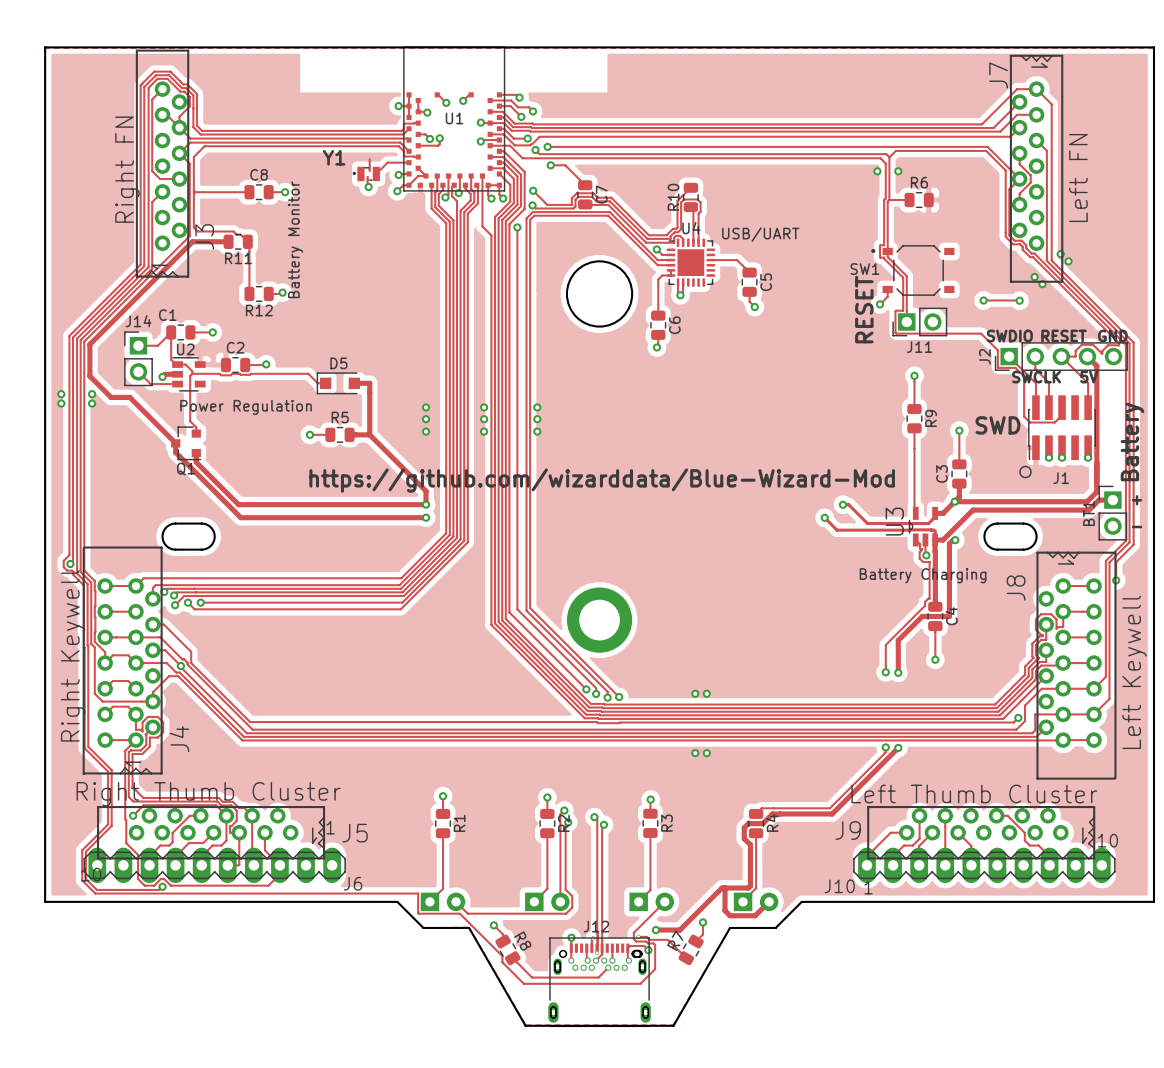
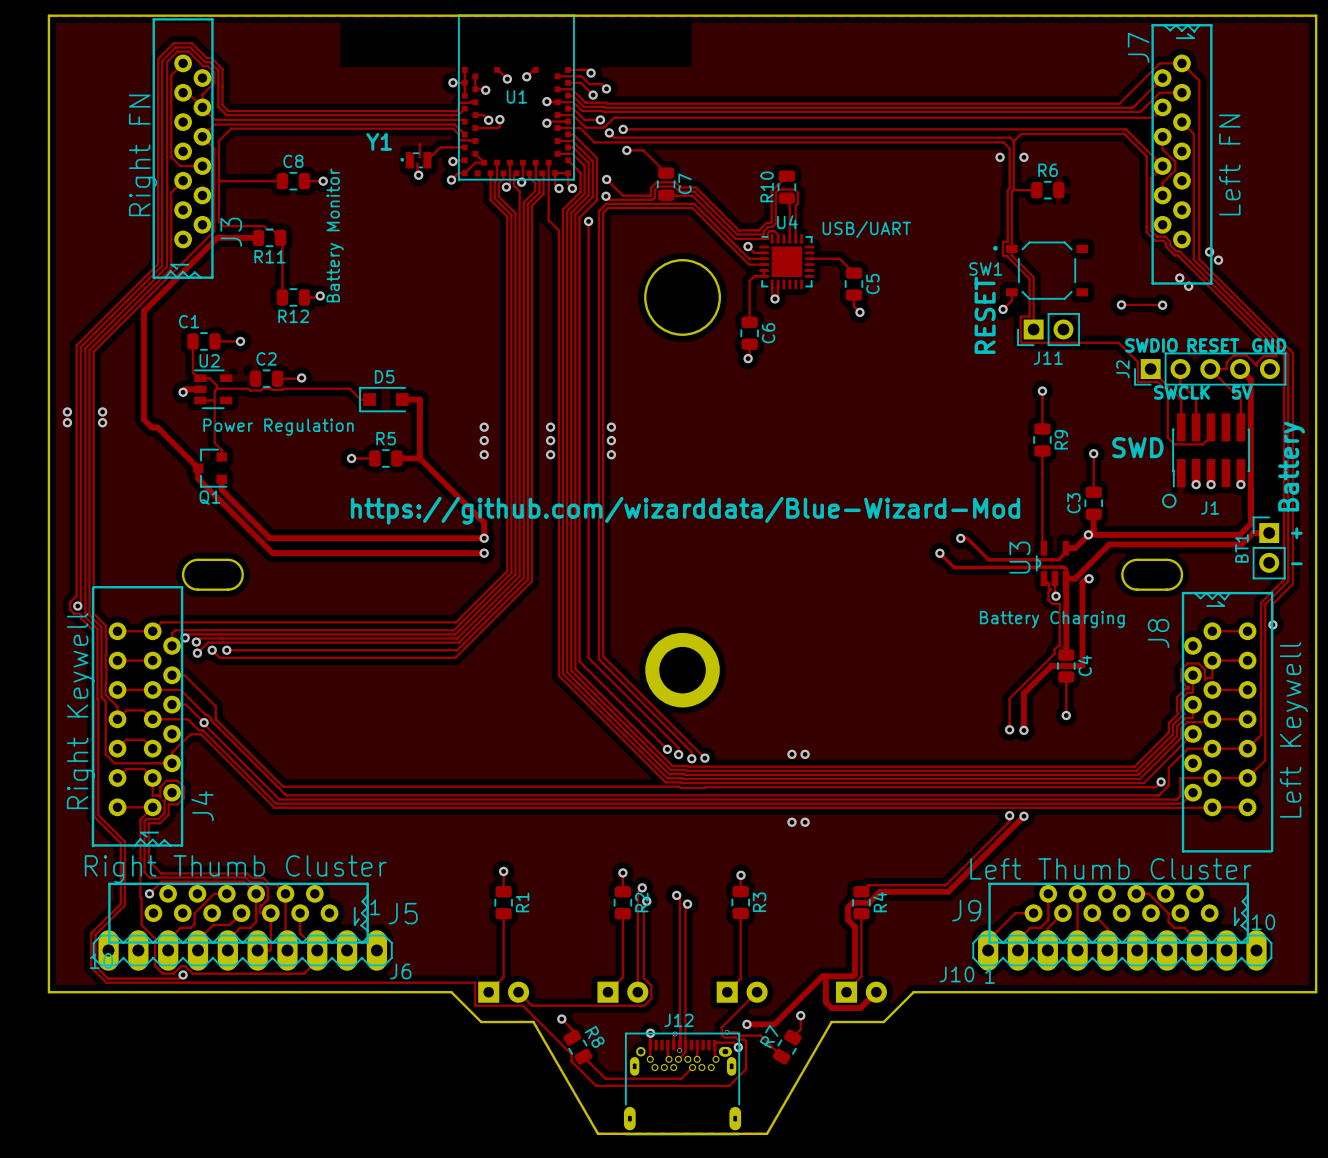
track: (128, 306) (89, 344) (89, 376) (111, 397) (129, 397) (140, 407) -> (143, 311) (143, 419) (151, 427) (157, 427)
track: (171, 332) (157, 345) (138, 345) -> none
J14: (138, 358) -> none
track: (138, 371) (150, 384) (177, 384) -> (214, 401) (200, 400)

